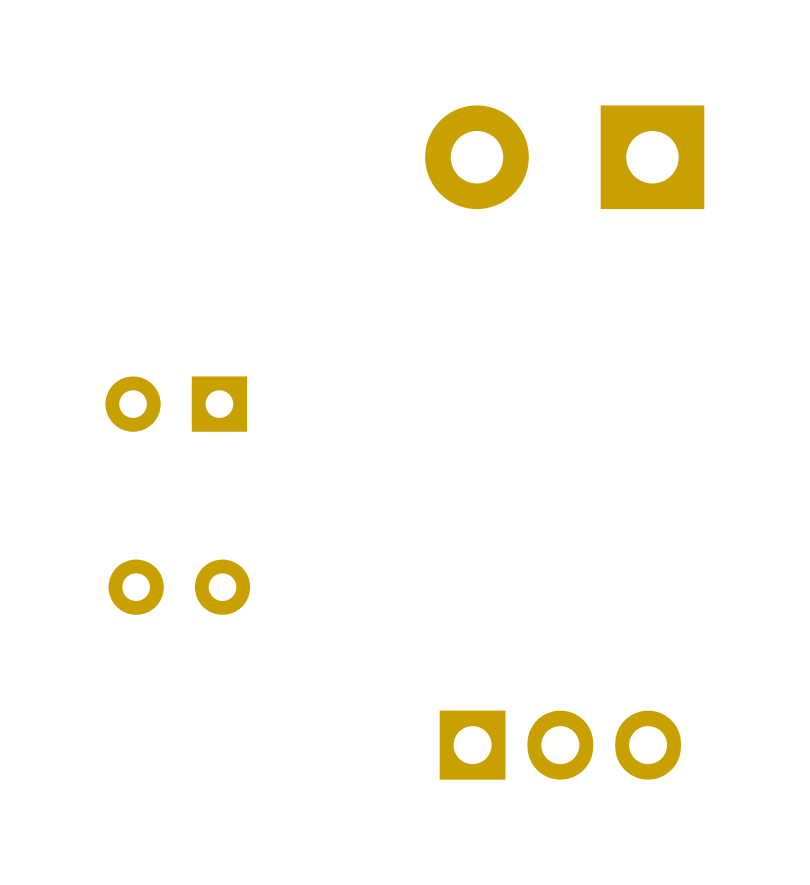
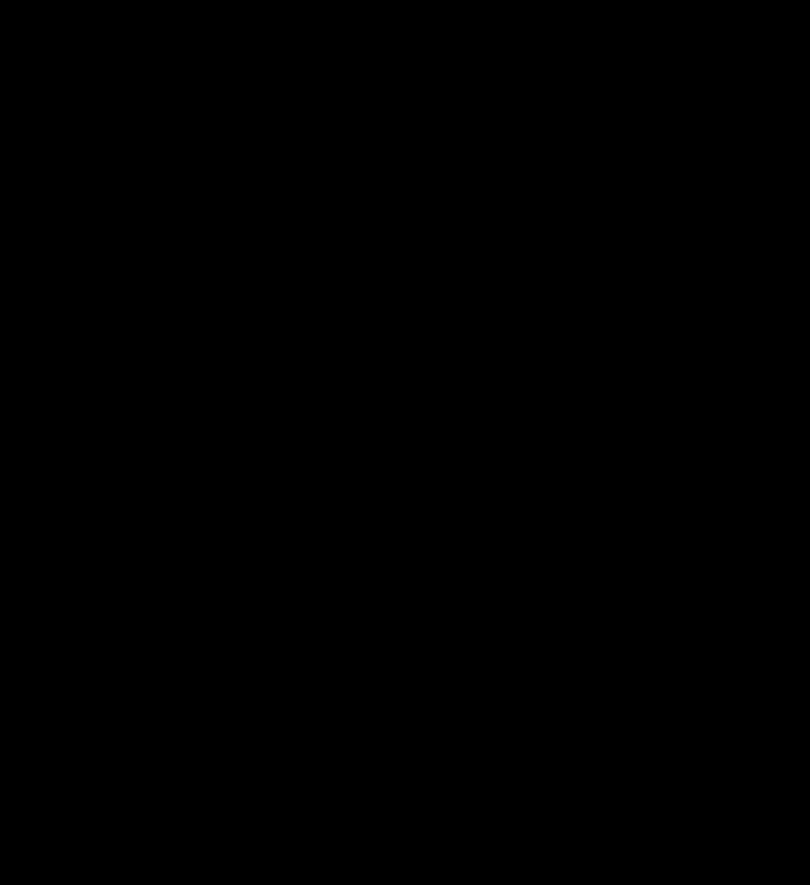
part: (564, 157) -> none
part: (176, 404) -> none
part: (179, 587) -> none
part: (560, 745) -> none

